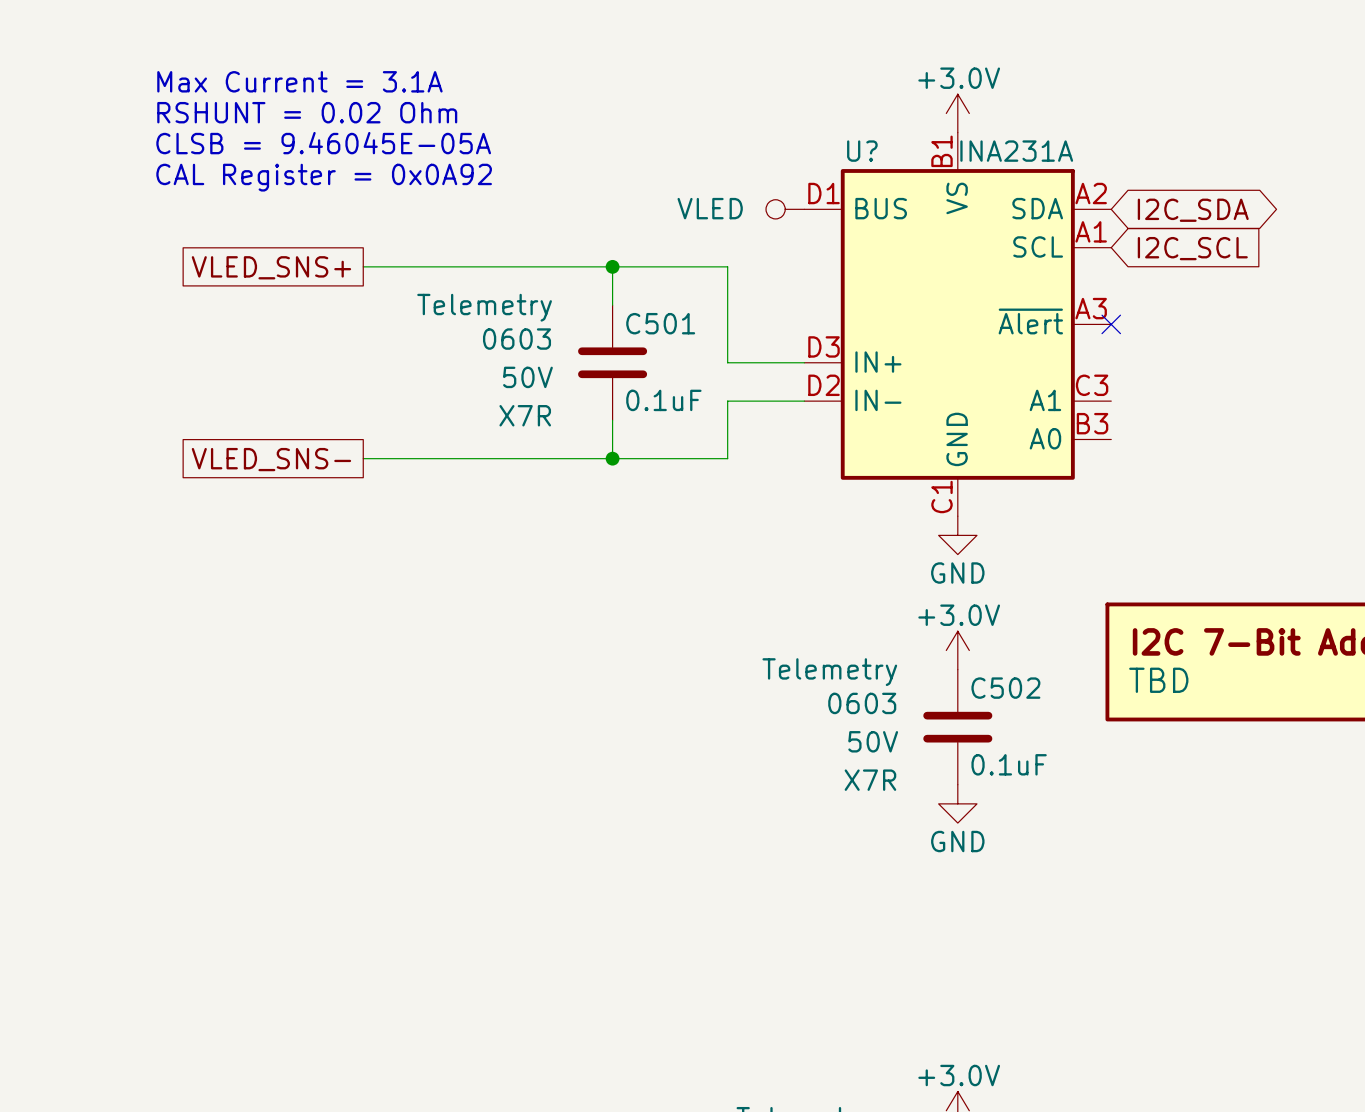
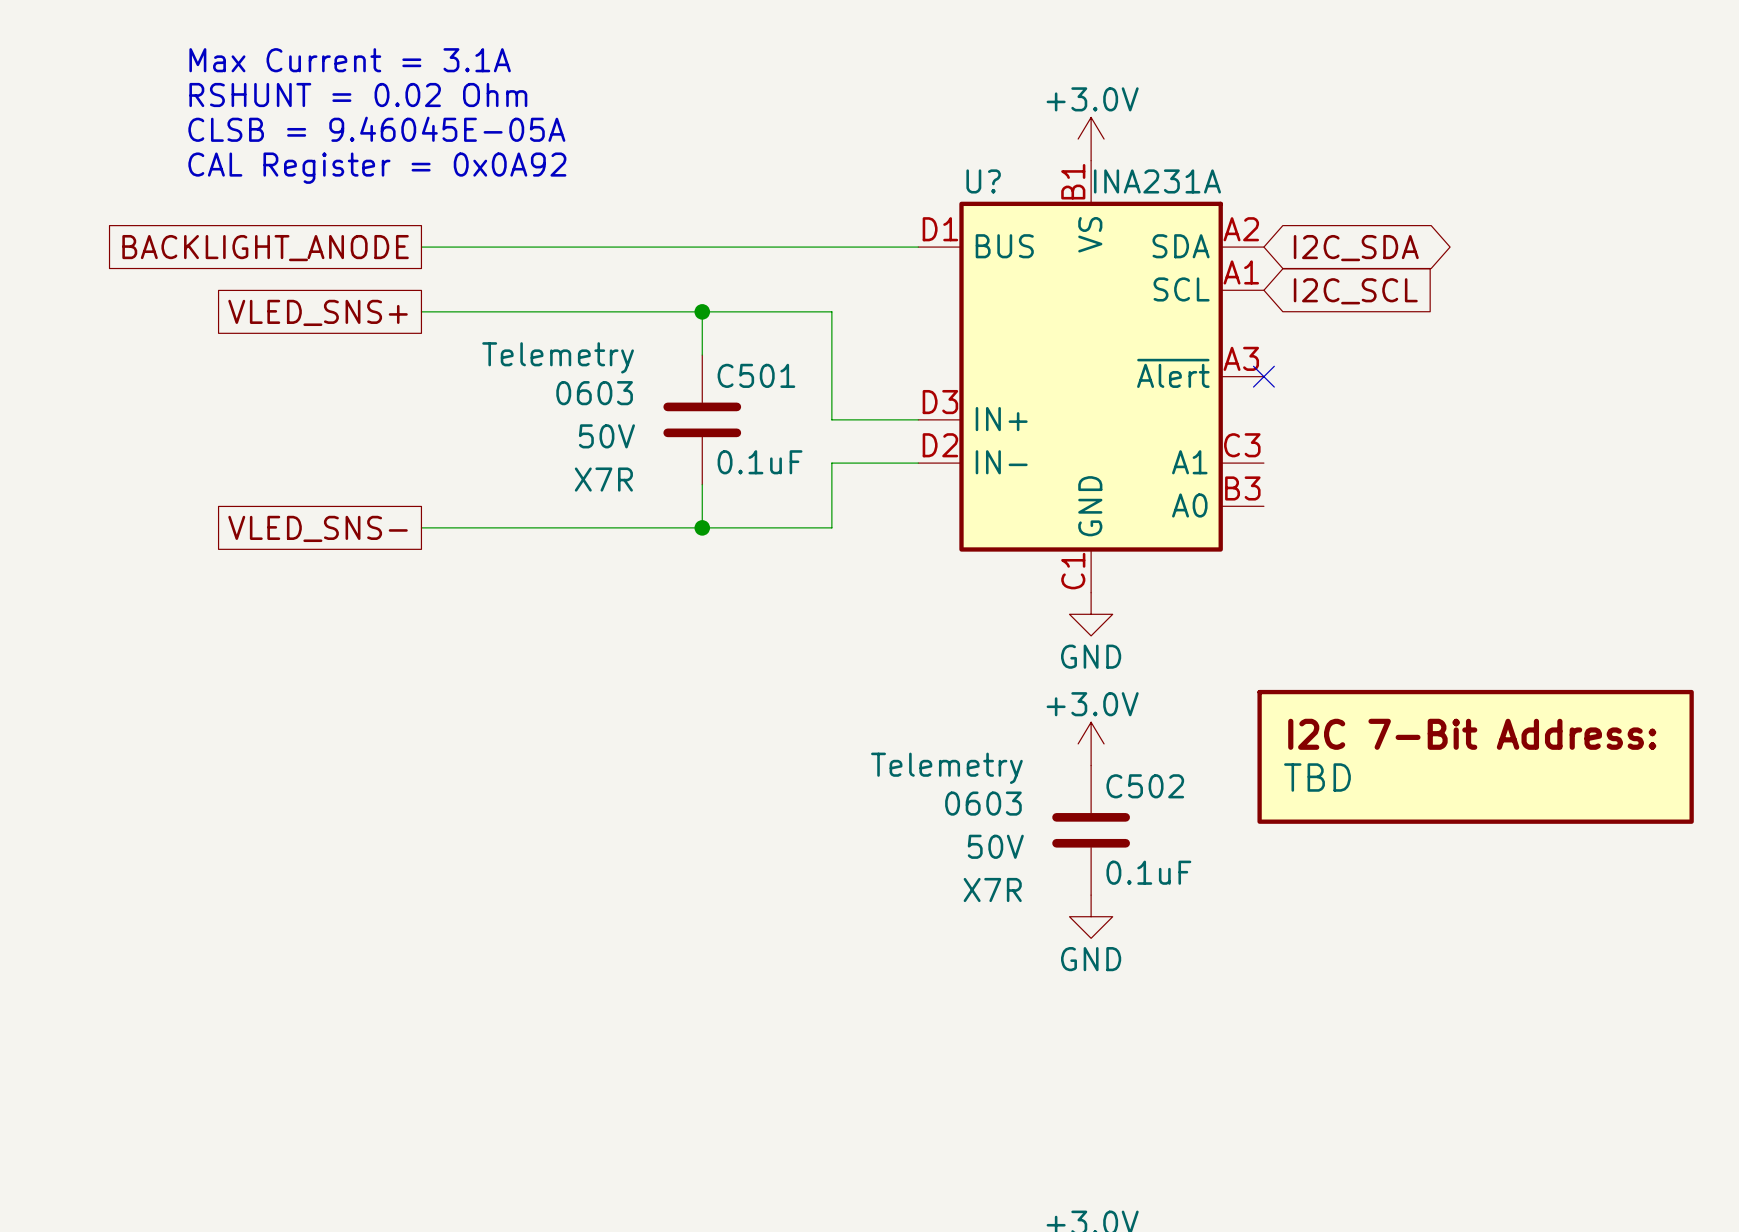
text: none -> Max Current = 3.1A (350, 60)
text: Max Current = 3.1A (299, 81) -> RSHUNT = 0.02 Ohm (358, 95)
text: RSHUNT = 0.02 Ohm (307, 112) -> CLSB = 9.46045E-05A (376, 129)
text: CLSB = 9.46045E-05A (323, 143) -> CAL Register = 0x0A92 (377, 168)
text: CAL Register = 0x0A92 (324, 177) -> none
wire: none -> (421, 247) (918, 247)
power symbol: VLED (785, 209) -> none
global label: none -> BACKLIGHT_ANODE (265, 248)

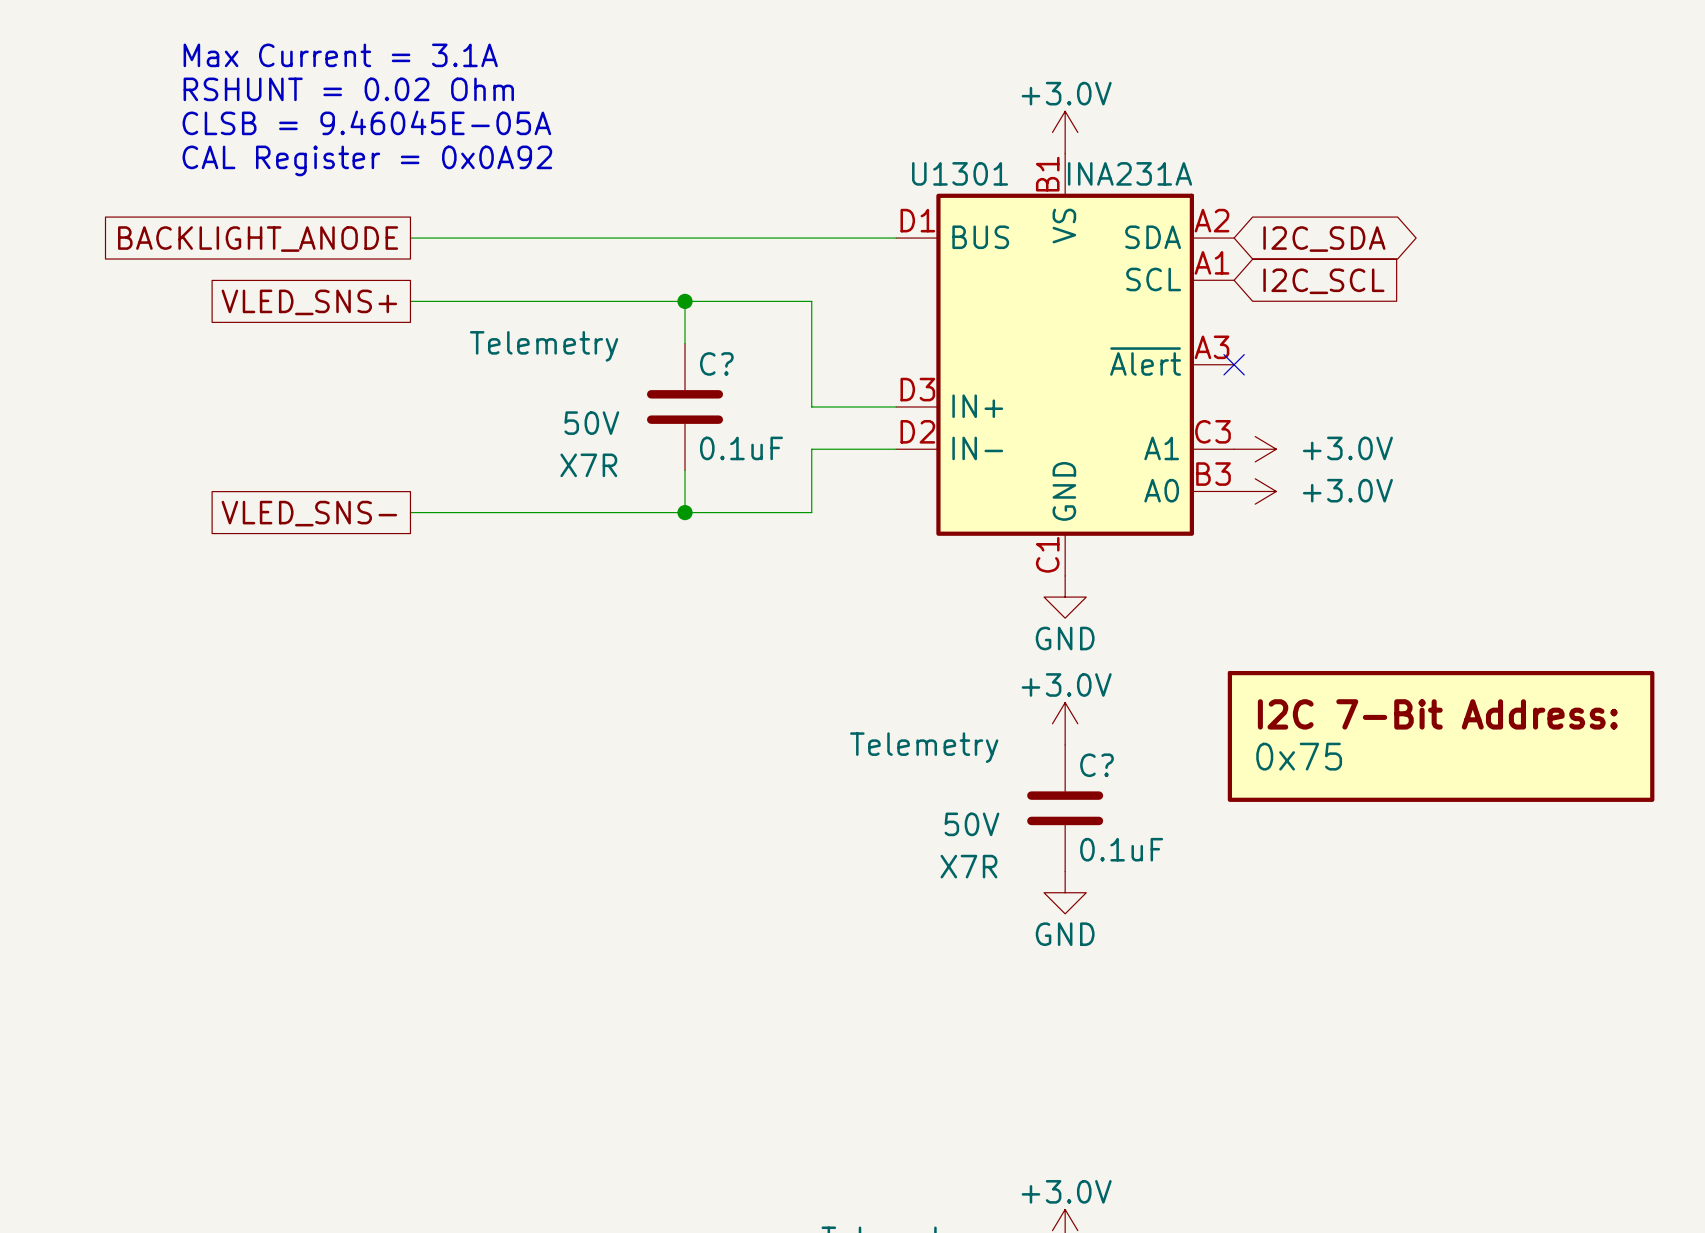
U? name: U? (983, 181) -> U1301 (960, 173)
C501 name: C501 (756, 375) -> C? (716, 363)
C501 text: 0603 (594, 393) -> none
power symbol: none -> +3.0V (1255, 449)
power symbol: none -> +3.0V (1255, 491)
part value: TBD (1317, 777) -> 0x75 (1299, 756)
C502 name: C502 (1145, 786) -> C? (1097, 765)
C502 text: 0603 (983, 803) -> none

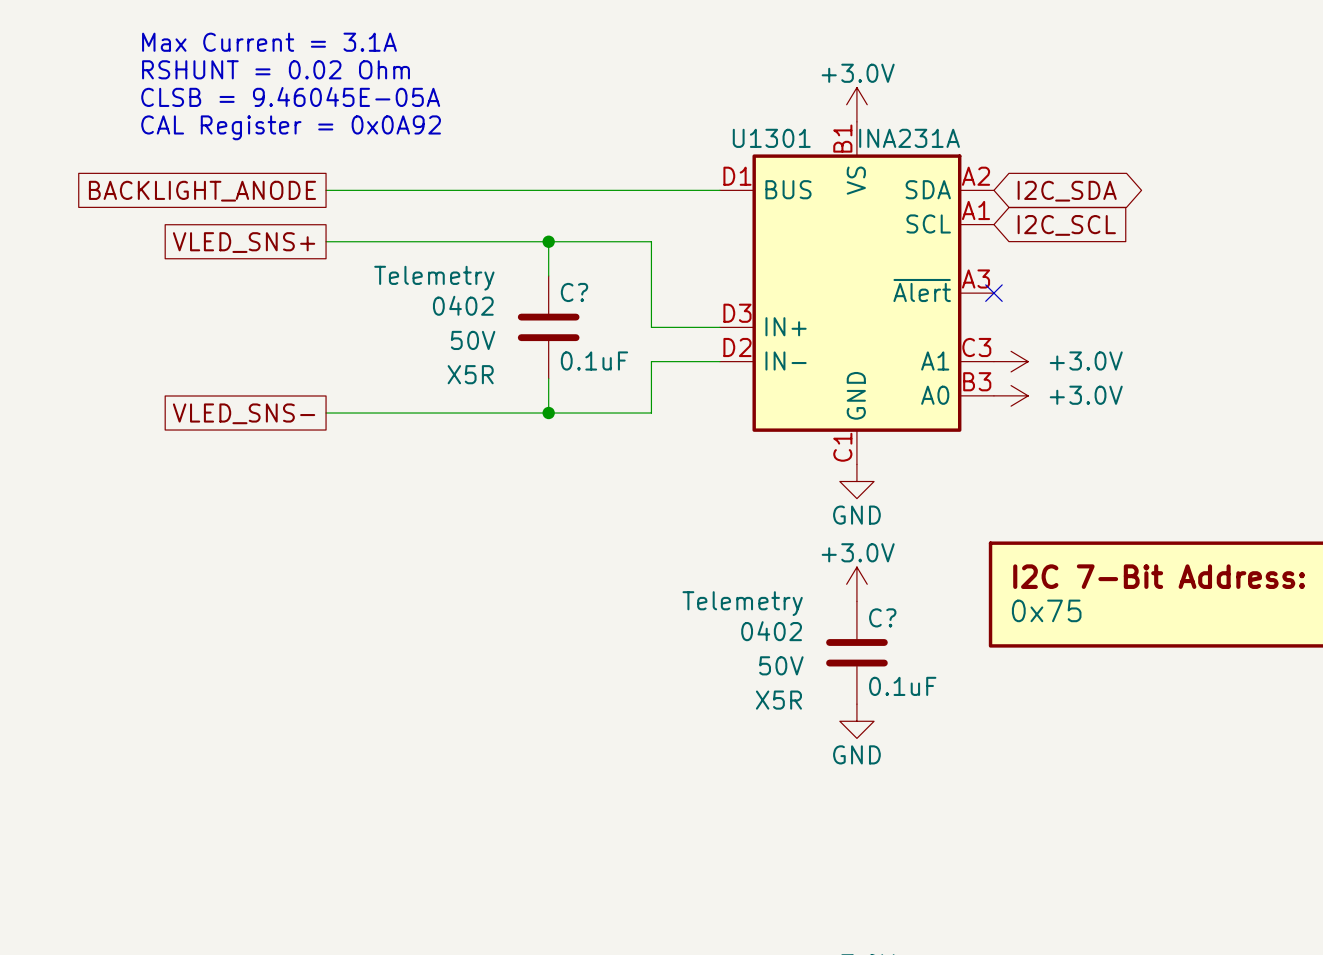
C? text: none -> 0402 (463, 305)
C? text: X7R (588, 465) -> X5R (470, 374)
C? text: none -> 0402 (771, 631)
C? text: X7R (968, 866) -> X5R (778, 700)

